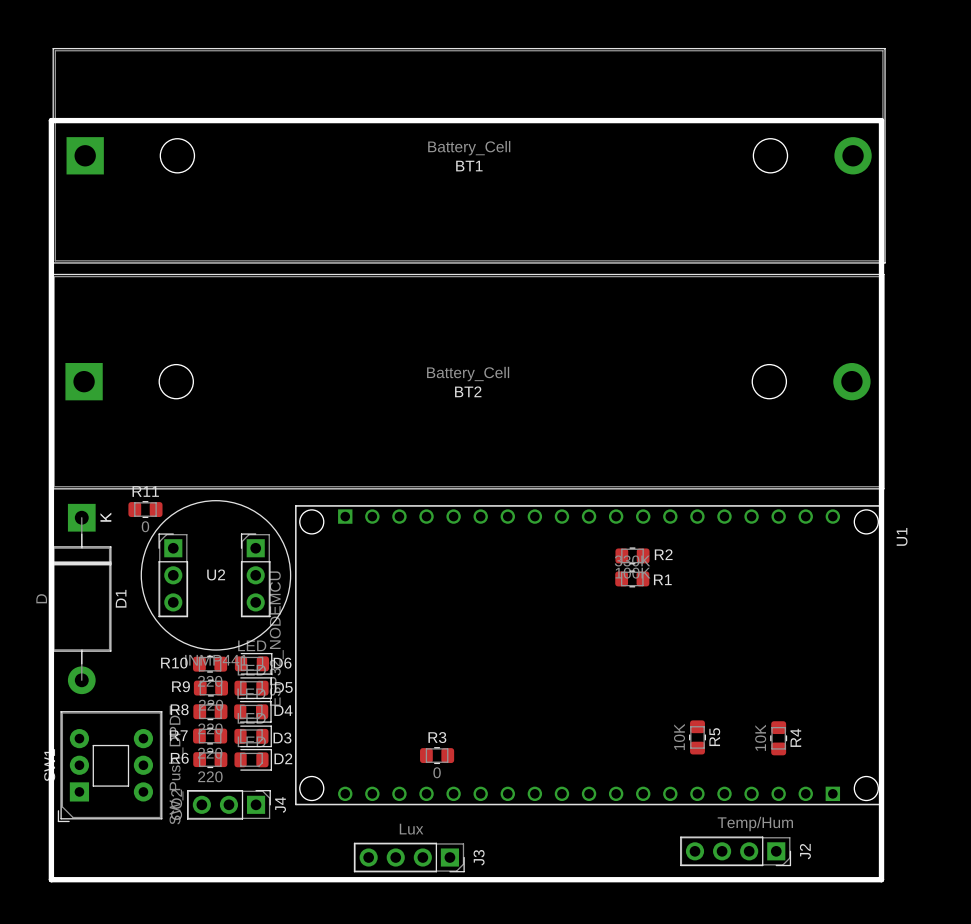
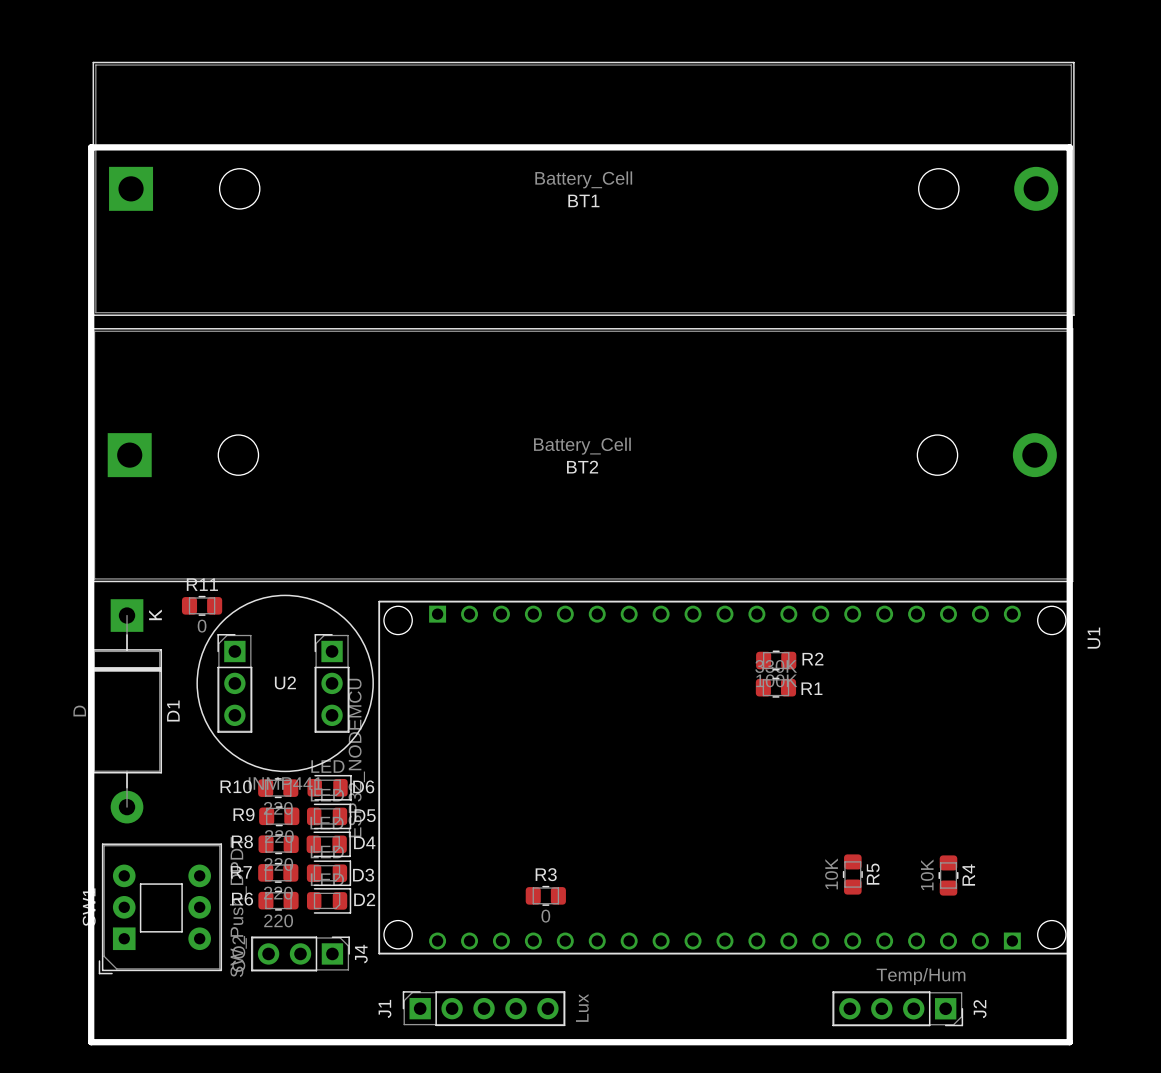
J1: none -> Lux (484, 1008)
J3: Lux (409, 857) -> none

